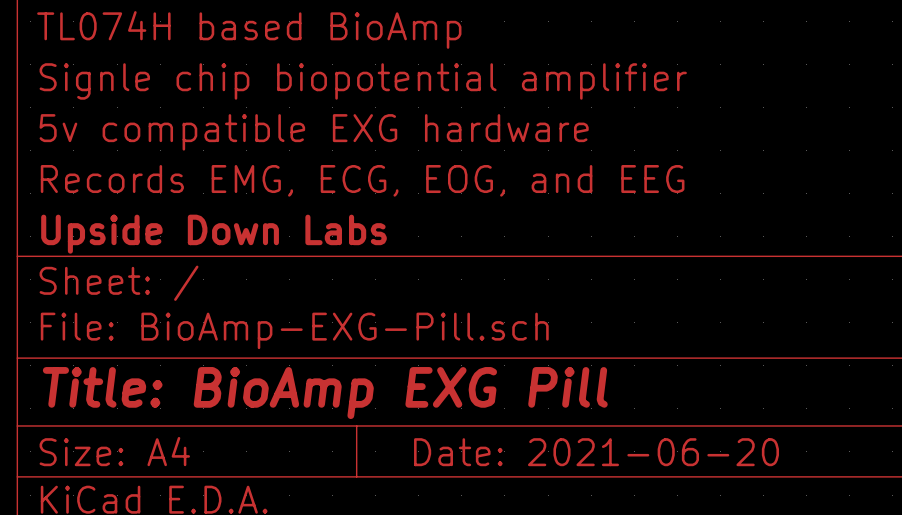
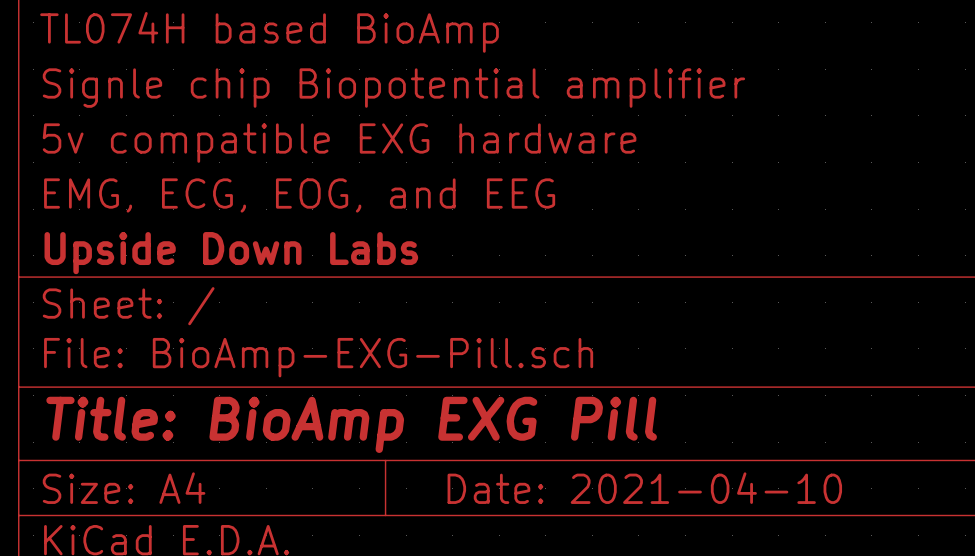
title block: Signle chip biopotential amplifier (363, 81) -> Signle chip Biopotential amplifier (393, 88)
title block: Records EMG, ECG, EOG, and EEG (362, 180) -> EMG, ECG, EOG, and EEG (299, 195)
title block: Date: 2021-06-20 (596, 452) -> Date: 2021-04-10 (644, 488)

